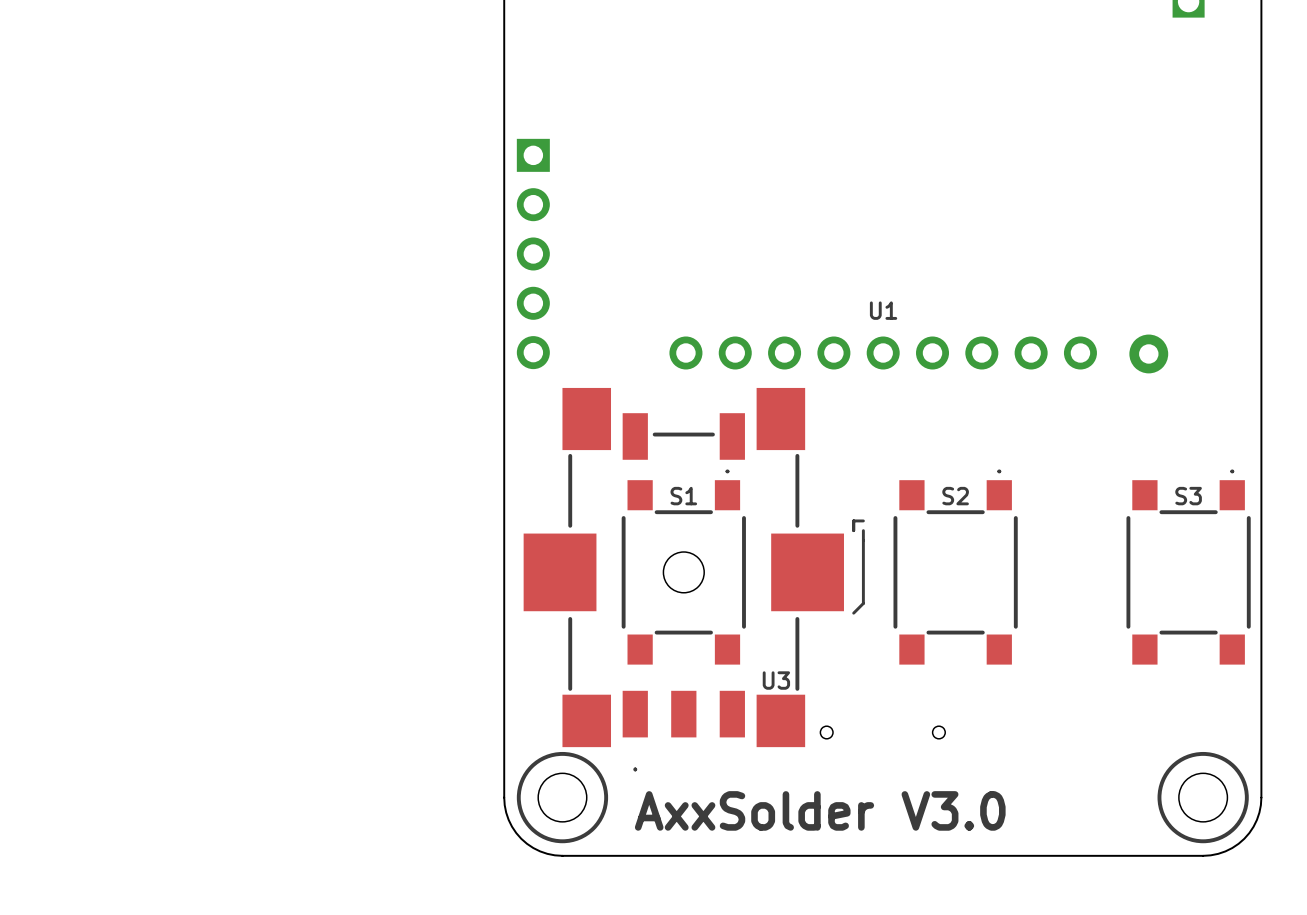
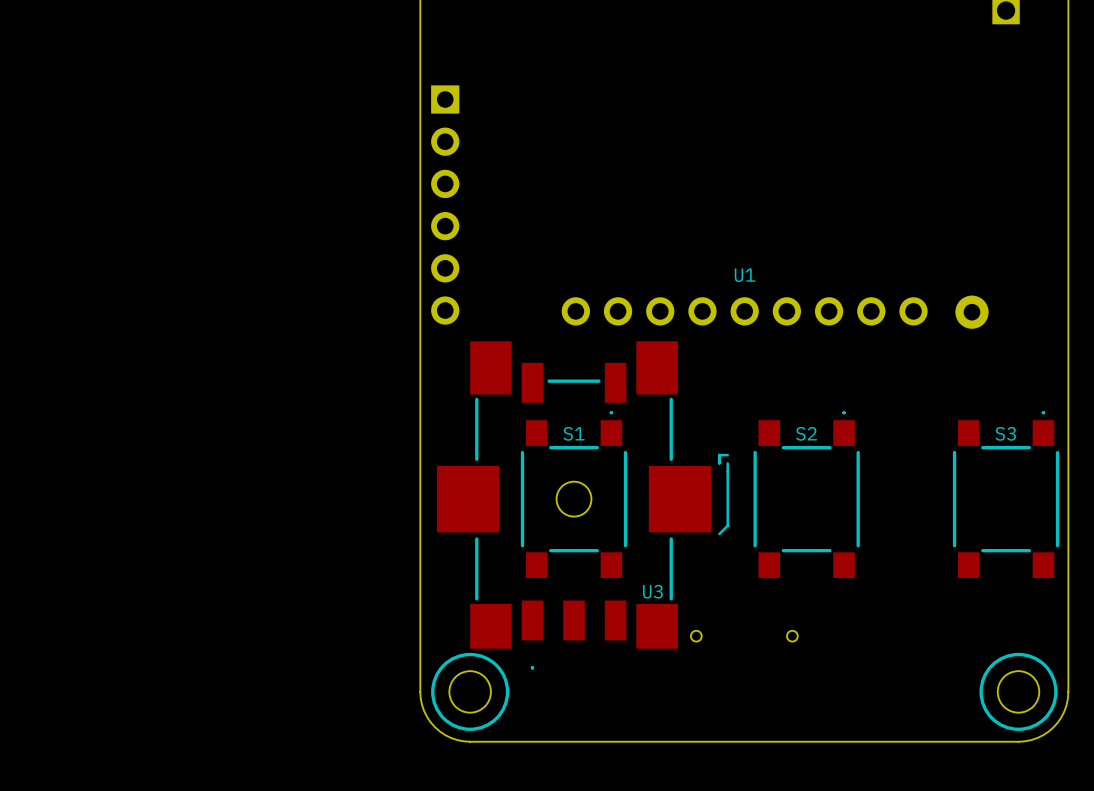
part: none -> (445, 205)
part: (533, 253) -> none
text: AxxSolder (754, 810) -> none
text: V3.0 (953, 810) -> none

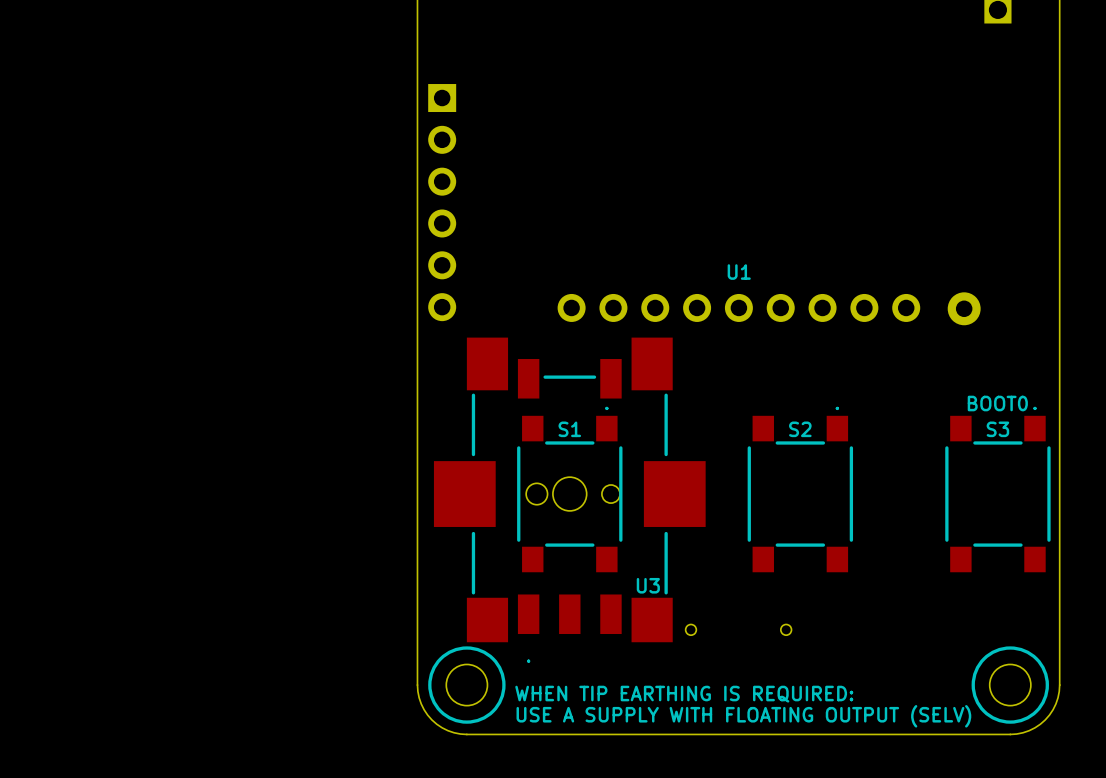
U3 footprint: [436, 341, 712, 670] -> [433, 337, 706, 663]
text: none -> BOOT0 (997, 403)
line: (727, 455) (719, 455) (719, 463) -> none
line: (727, 463) (727, 525) (719, 534) -> none
text: none -> WHEN TIP EARTHING IS REQUIRED: (684, 694)
text: none -> USE A SUPPLY WITH FLOATING OUTPUT (SELV) (743, 716)

